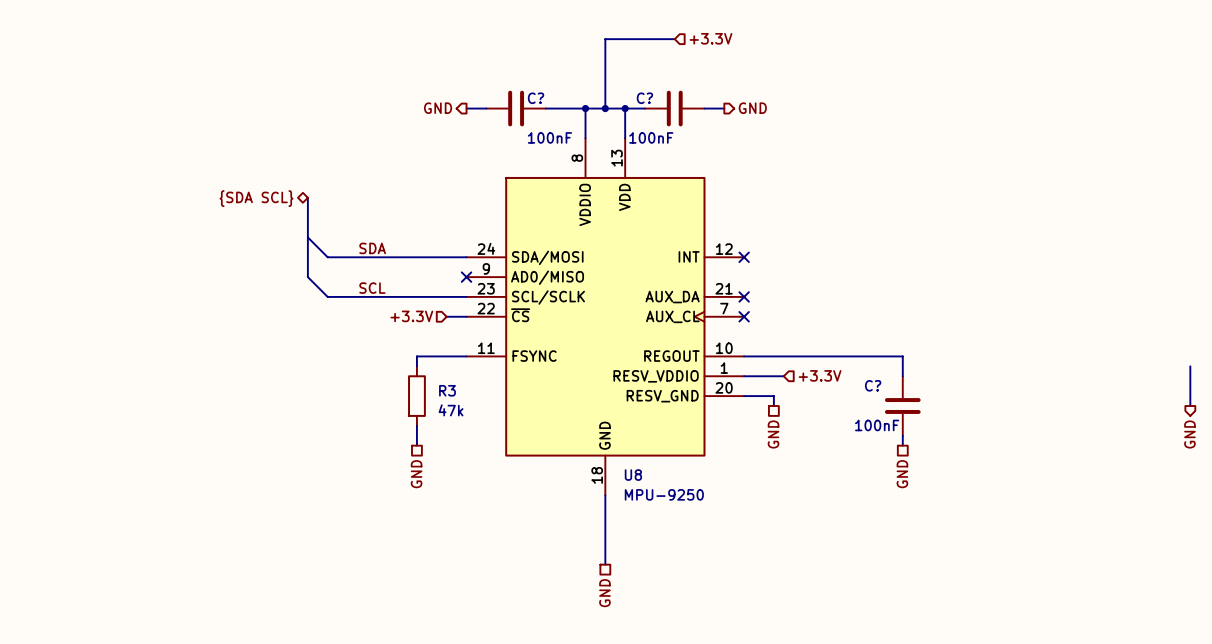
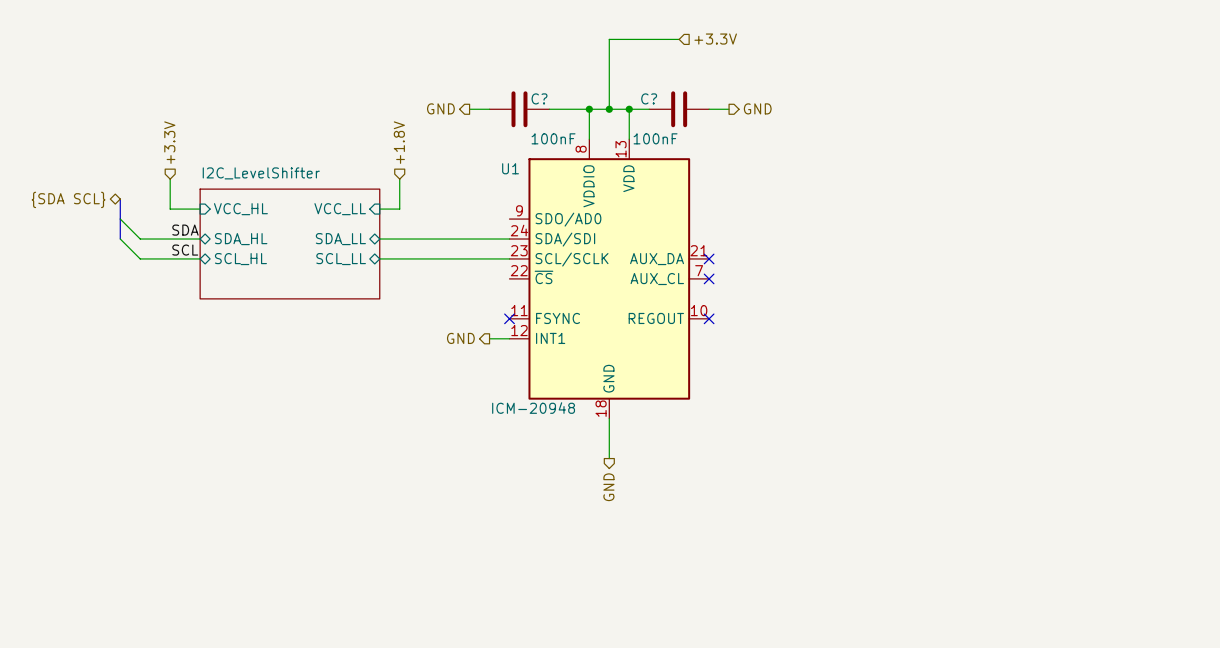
hierarchical label: none -> +3.3V (169, 142)
hierarchical label: none -> +1.8V (399, 142)
wire: none -> (170, 179) (170, 209) (200, 209)
wire: none -> (399, 179) (399, 209) (379, 209)
bus: none -> (120, 199) (120, 239)
bus: (307, 197) (307, 277) -> none
hierarchical label position: {SDA SCL} (256, 198) -> {SDA SCL} (68, 199)
sheet pin: none -> VCC_HL (240, 209)
sheet pin: none -> VCC_LL (340, 209)
wire: none -> (120, 219) (140, 239) (200, 239)
wire: none -> (120, 239) (140, 258) (200, 258)
sheet pin: none -> SDA_HL (241, 239)
wire: (307, 237) (327, 257) (377, 257) -> none
sheet pin: none -> SDA_LL (340, 239)
wire: none -> (379, 239) (509, 239)
sheet I2C_LevelShifter: none -> (289, 243)
label position: SDA (372, 248) -> SDA (185, 230)
sheet pin: none -> SCL_HL (240, 259)
sheet pin: none -> SCL_LL (341, 259)
no-connect mark: none -> (709, 258)
no-connect mark: (744, 257) -> none
wire: (307, 277) (327, 296) (466, 296) -> none
no-connect mark: (466, 277) -> none
U1: none -> ICM-20948 (609, 278)
no-connect mark: none -> (709, 278)
label position: SCL (372, 288) -> SCL (185, 250)
no-connect mark: (744, 296) -> none
hierarchical label: +3.3V (411, 316) -> none
wire: (446, 316) (466, 316) -> (489, 338) (509, 338)
no-connect mark: none -> (509, 318)
U8: MPU-9250 (605, 316) -> none
no-connect mark: none -> (709, 318)
no-connect mark: (744, 316) -> none
hierarchical label: none -> GND (460, 338)
wire: (466, 356) (416, 356) (416, 366) -> none
wire: (744, 356) (902, 356) (902, 376) -> none
wire: (1190, 366) (1190, 406) -> none
hierarchical label: +3.3V (820, 375) -> none
wire: (744, 376) (783, 376) -> none
R3: 47k (416, 396) -> none
wire: (744, 396) (773, 396) (773, 406) -> none
C?: 100nF (902, 406) -> none
wire: (416, 425) (416, 445) -> none
hierarchical label: GND (773, 434) -> none
hierarchical label: GND (1189, 434) -> none
wire: (902, 435) (902, 445) -> none
hierarchical label: GND (416, 474) -> none
hierarchical label: GND (902, 474) -> none
hierarchical label: none -> GND (608, 487)
wire: (605, 495) (605, 564) -> none
hierarchical label: GND (604, 593) -> none

